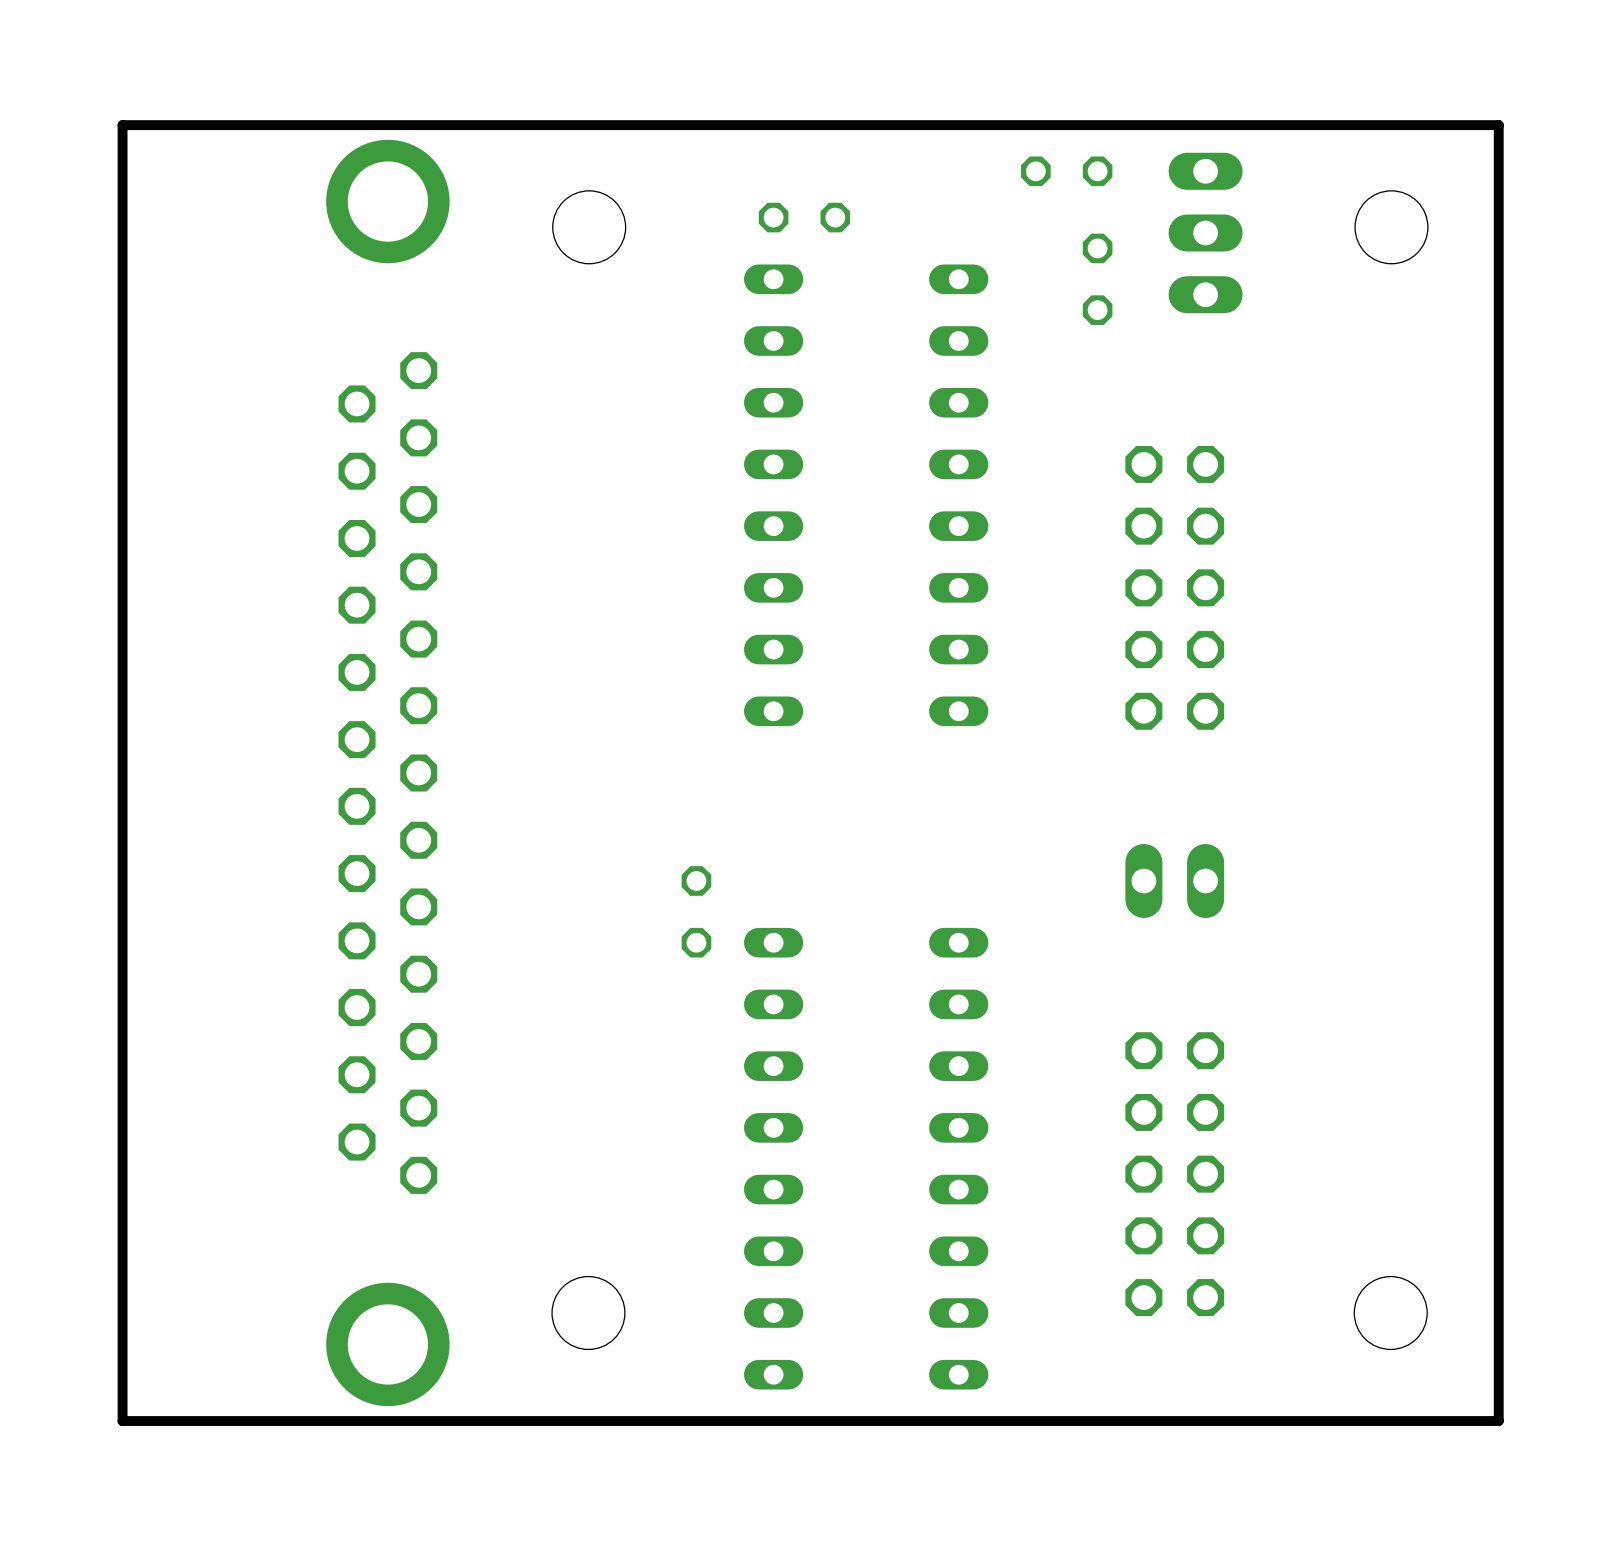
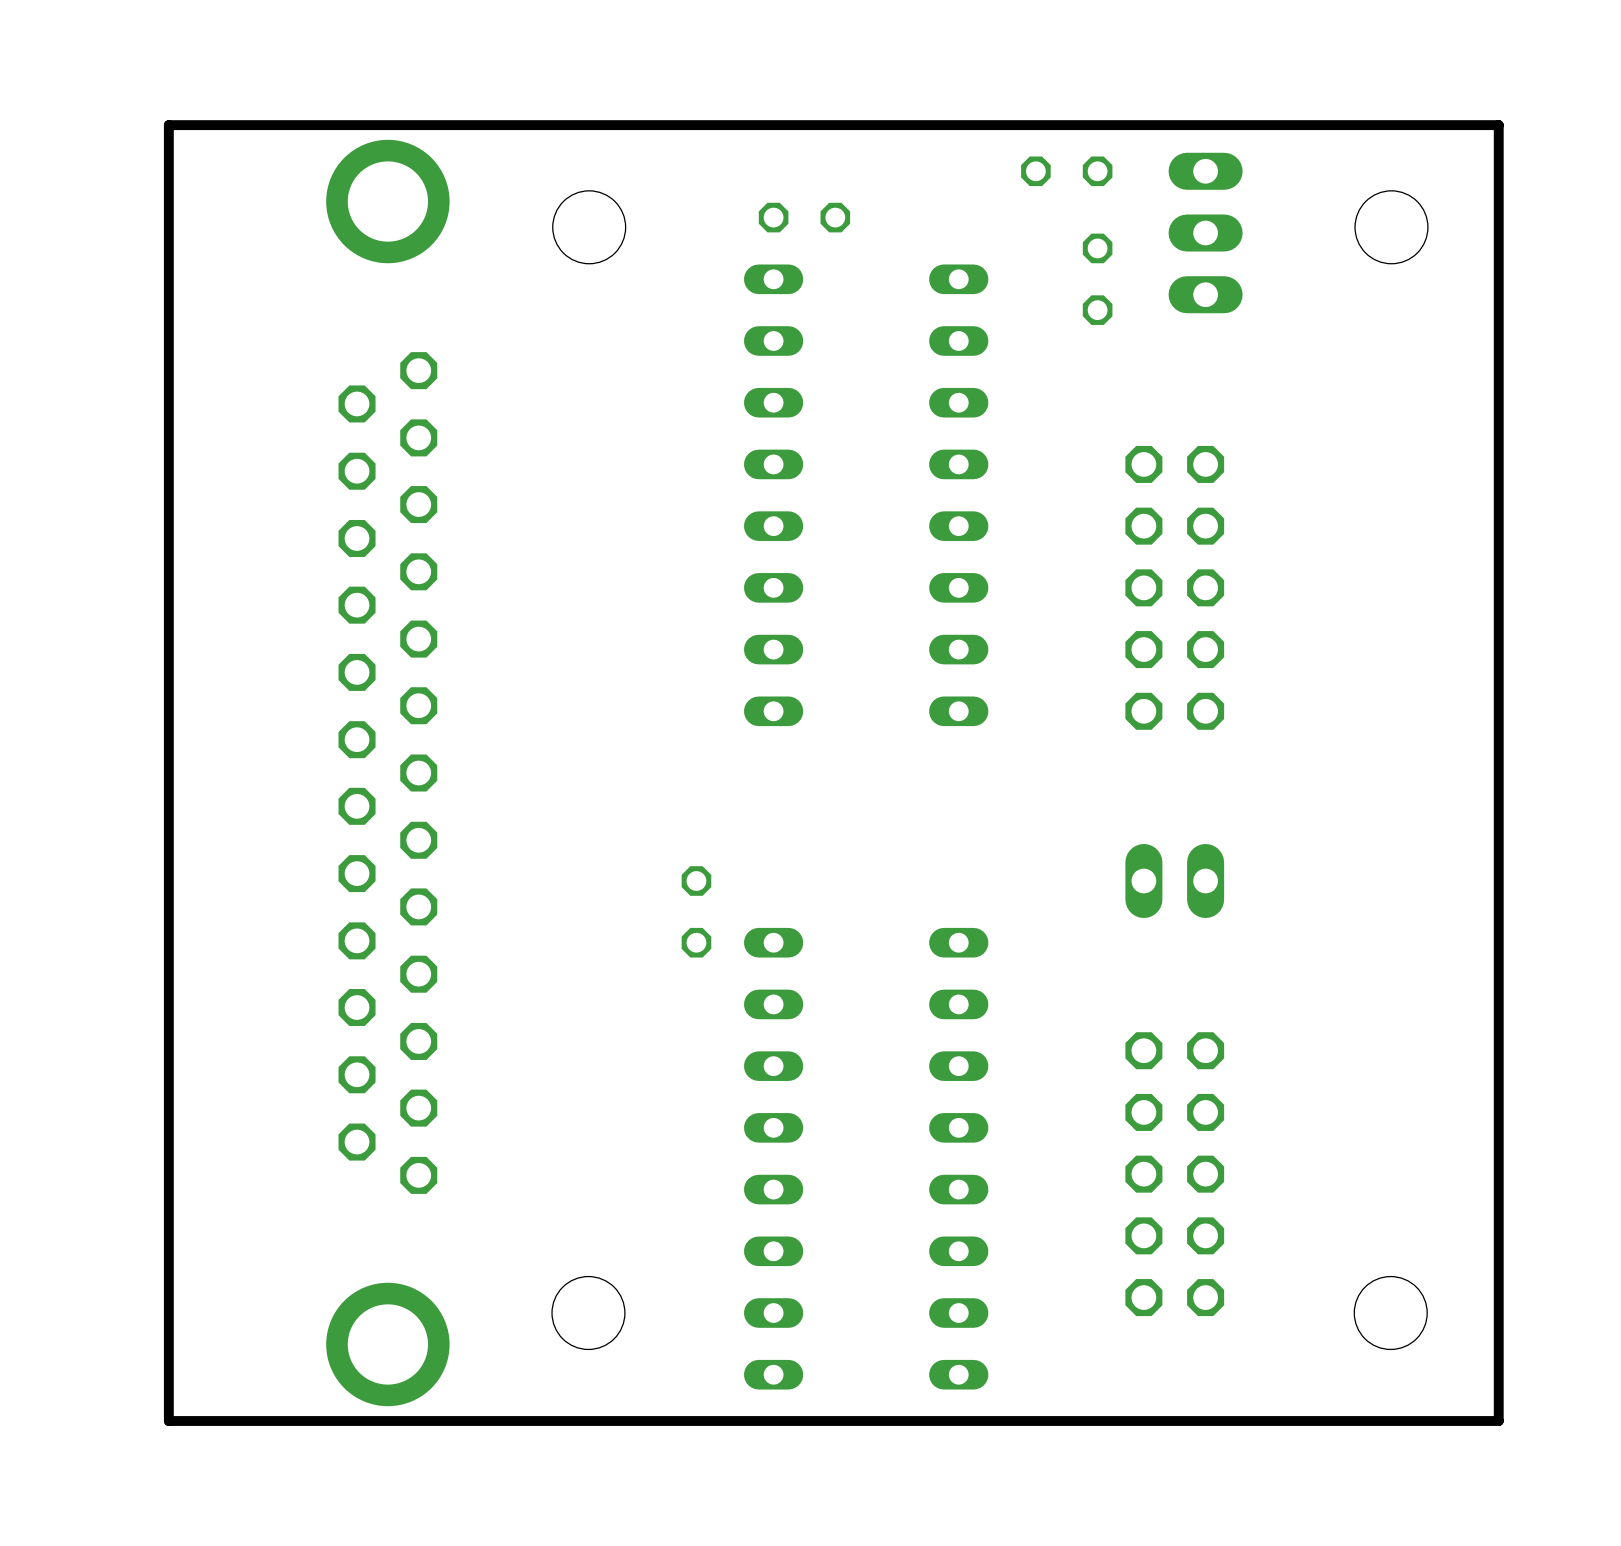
board edge: (168, 125) (122, 125) (122, 1421) (168, 1421) -> (168, 125) (168, 1421)

